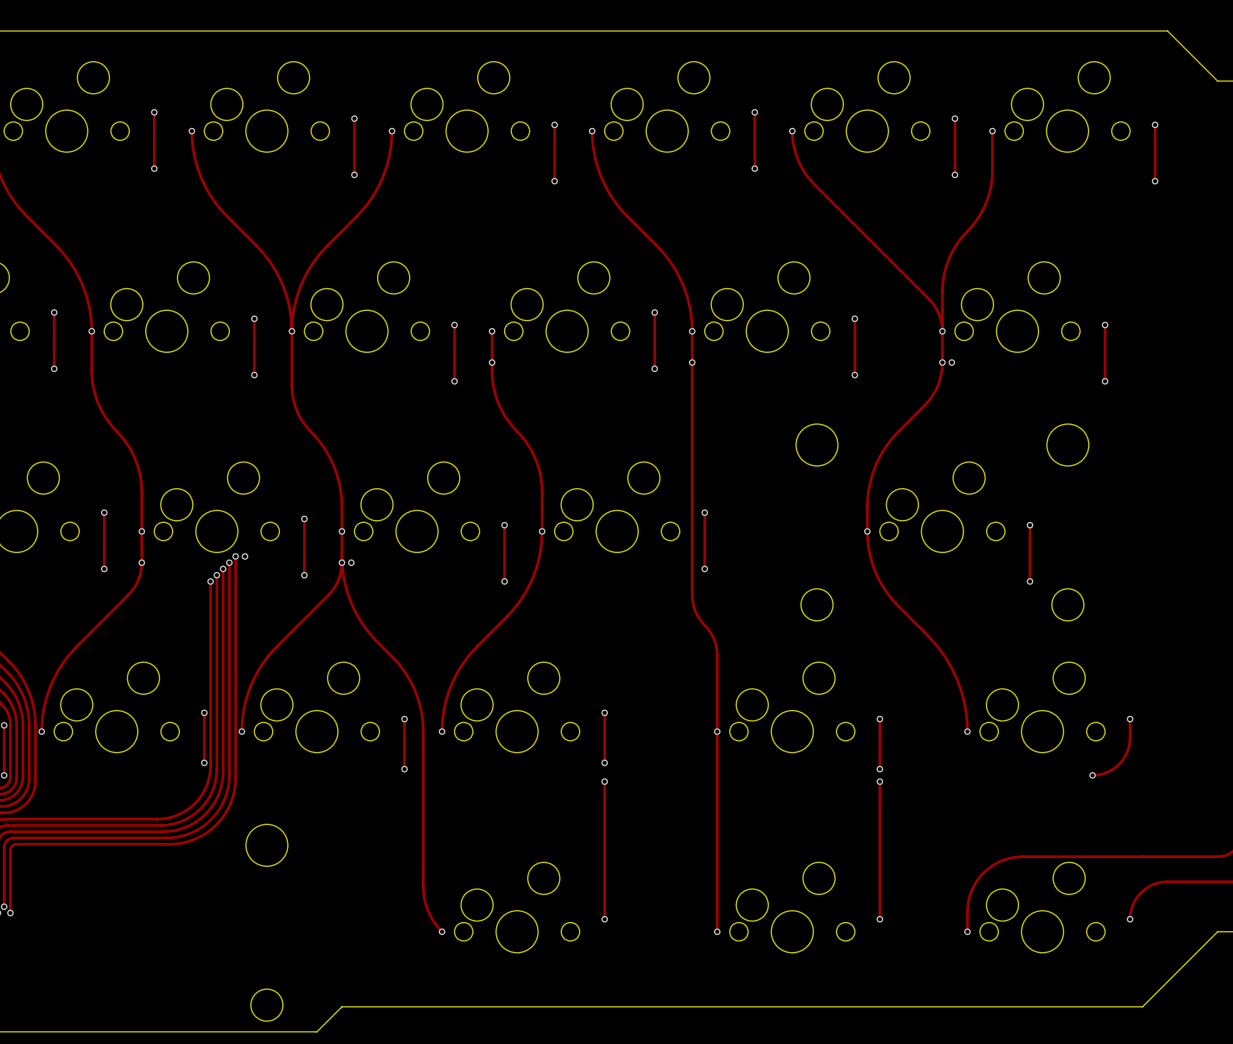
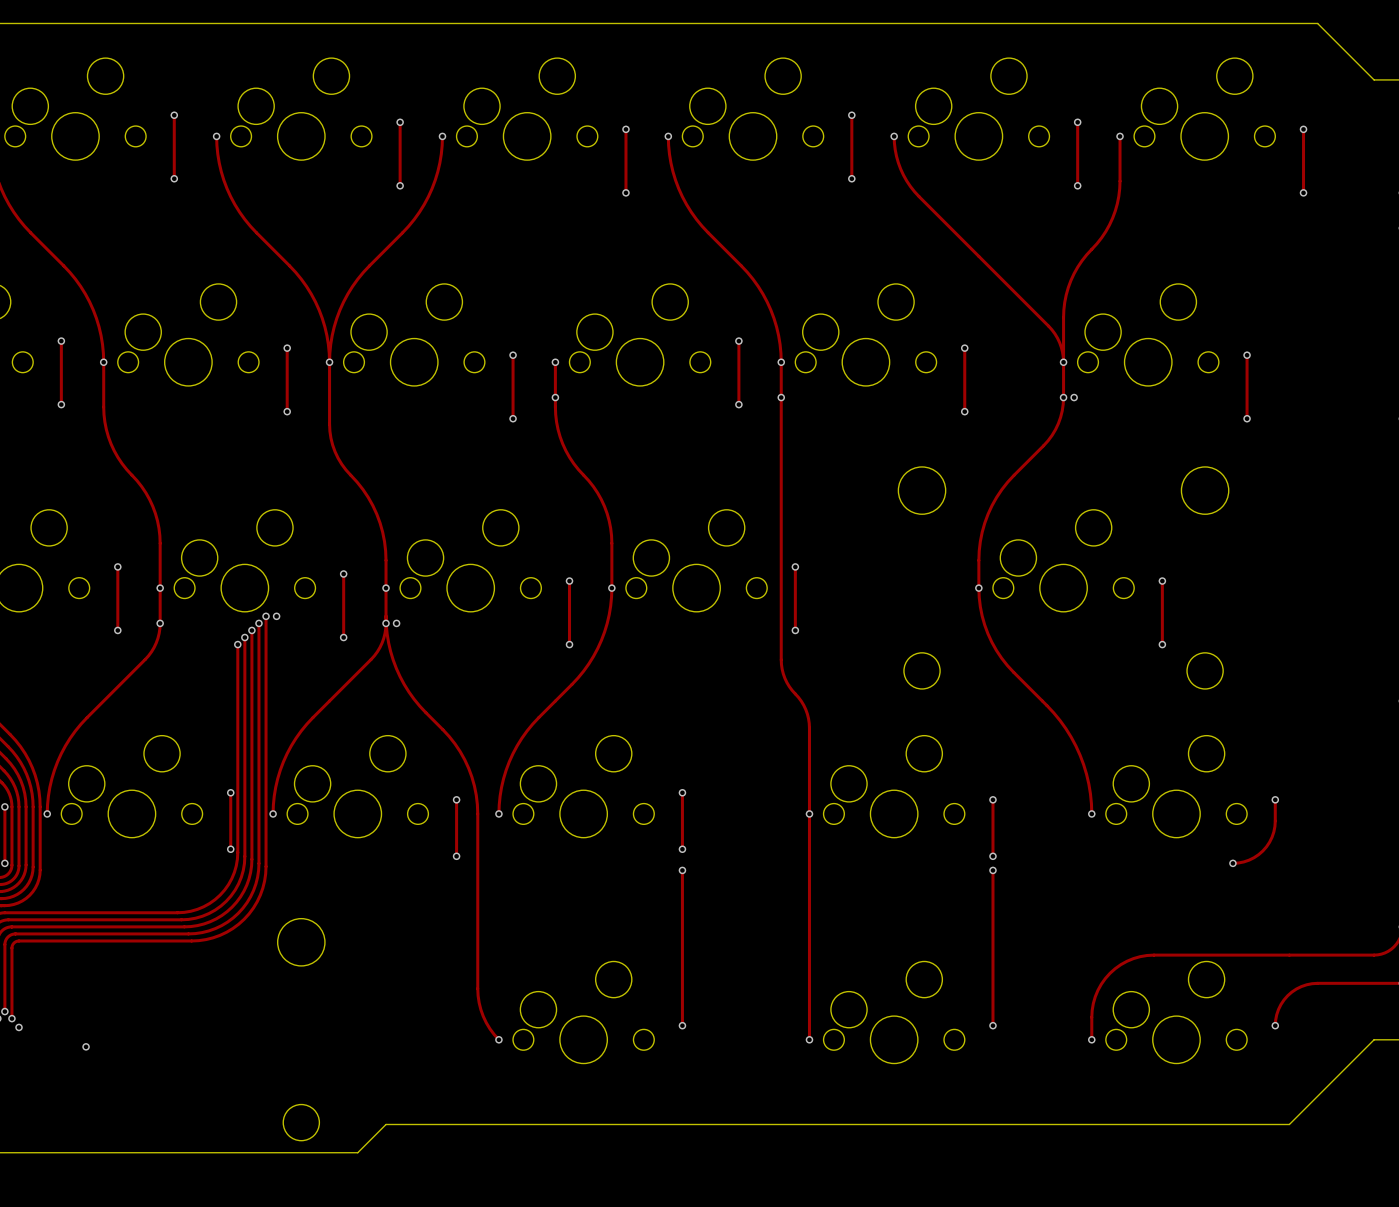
via: none -> (19, 1027)
via: none -> (86, 1046)

